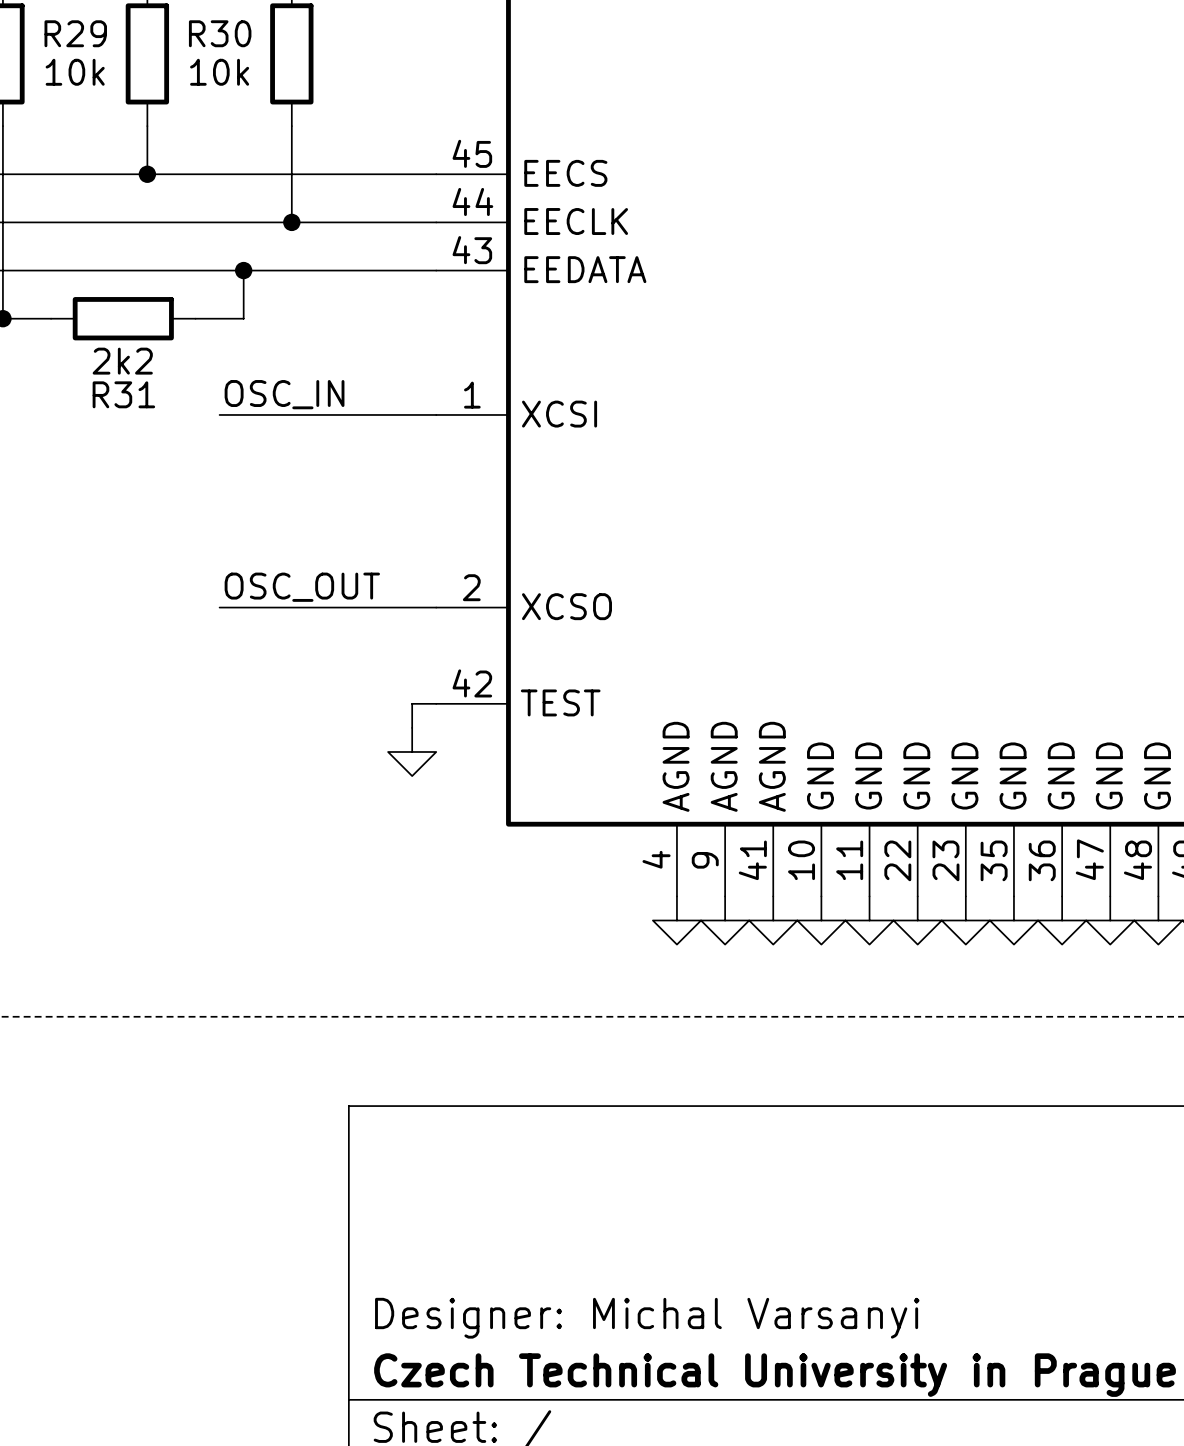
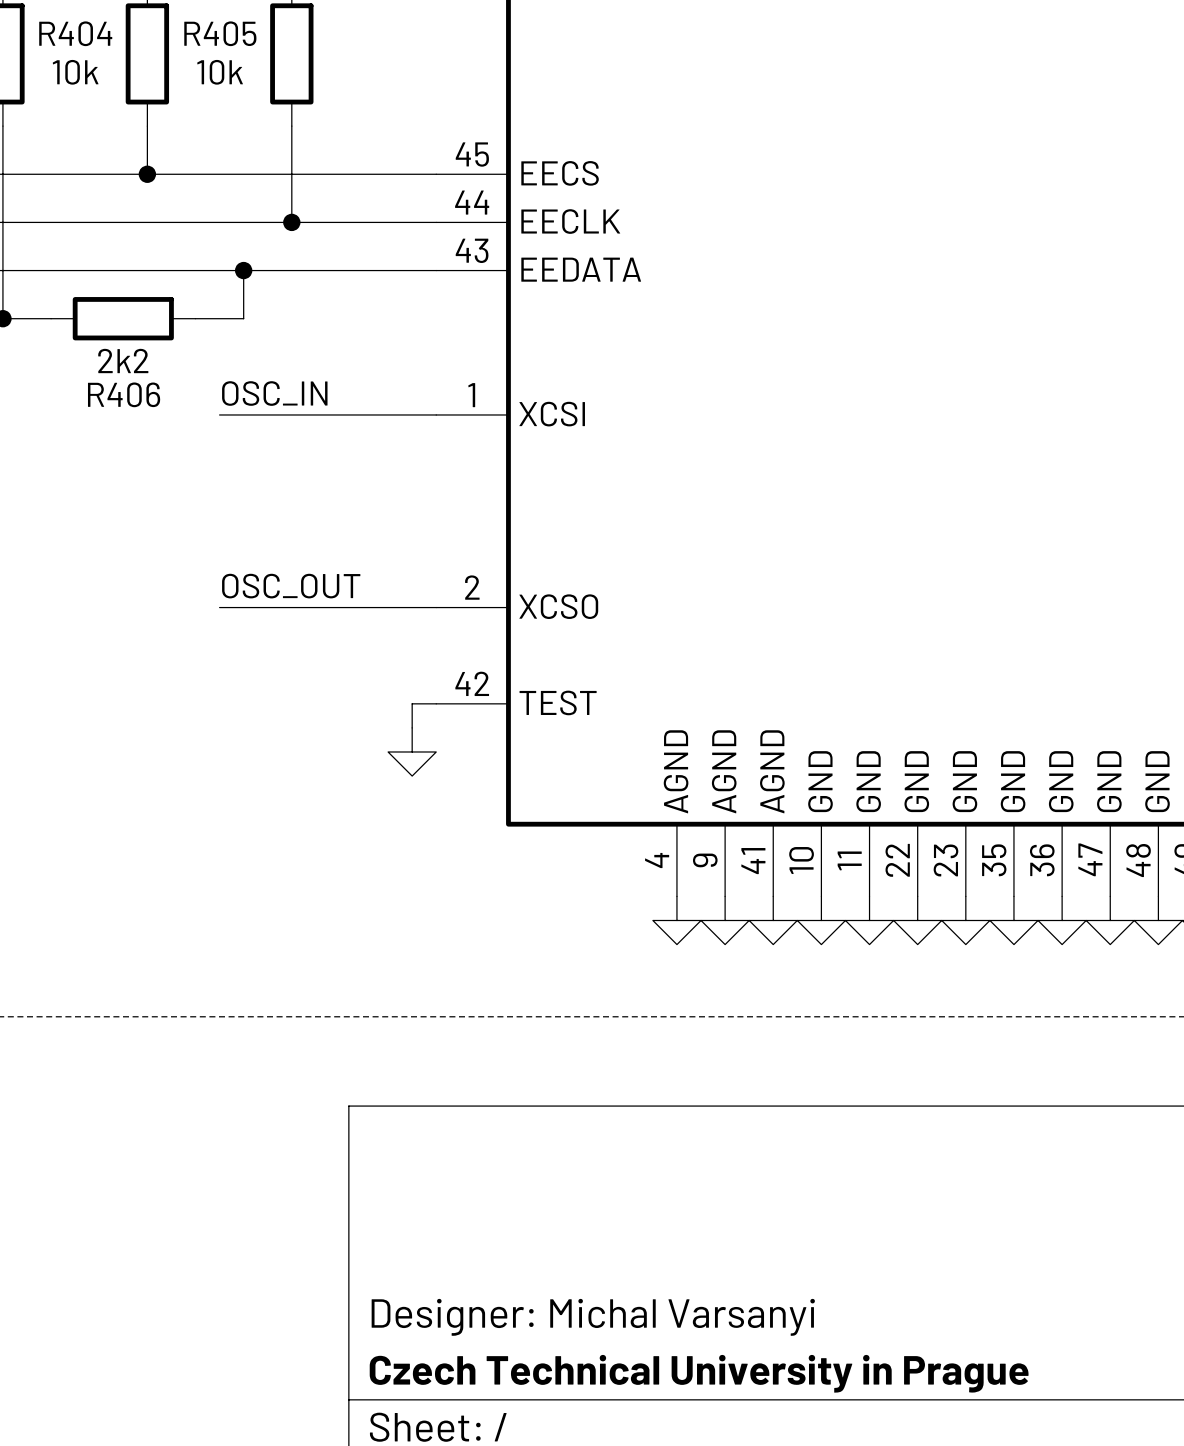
R29 name: R29 (75, 33) -> R404 (75, 33)
R30 name: R30 (220, 33) -> R405 (220, 33)
R31 name: R31 (123, 394) -> R406 (124, 394)

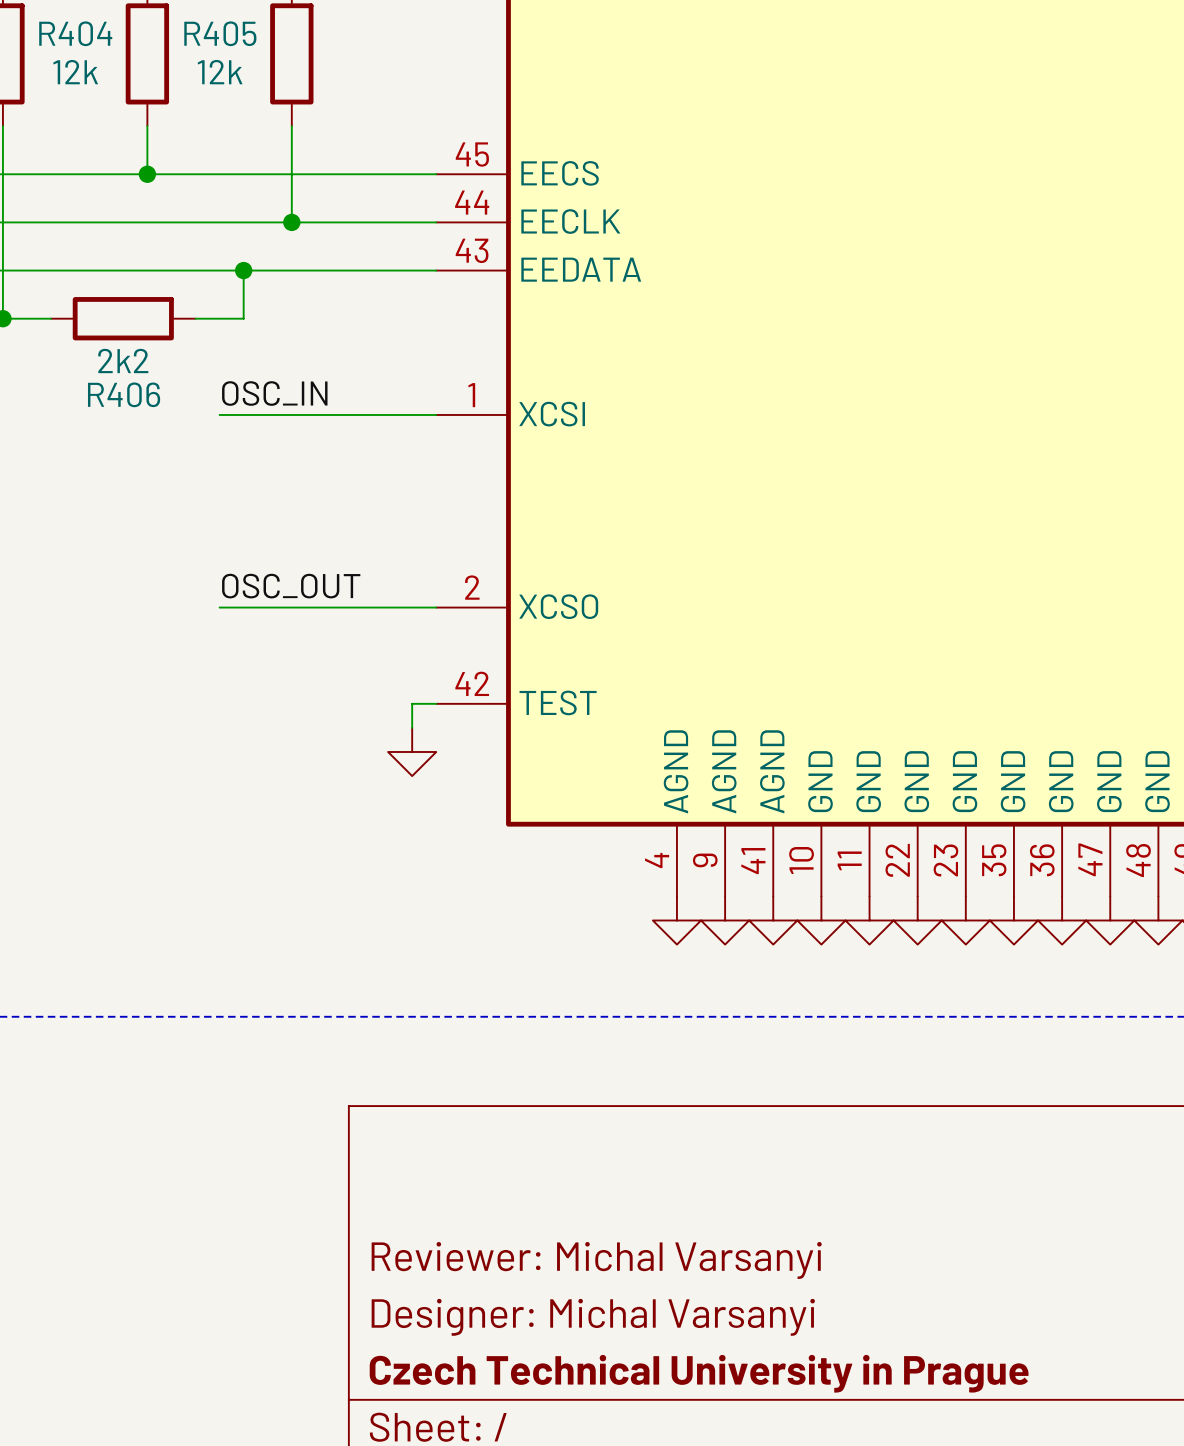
R404 value: 10k (75, 72) -> 12k (75, 72)
R405 value: 10k (220, 72) -> 12k (220, 72)
title block: none -> Reviewer: Michal Varsanyi (596, 1260)

